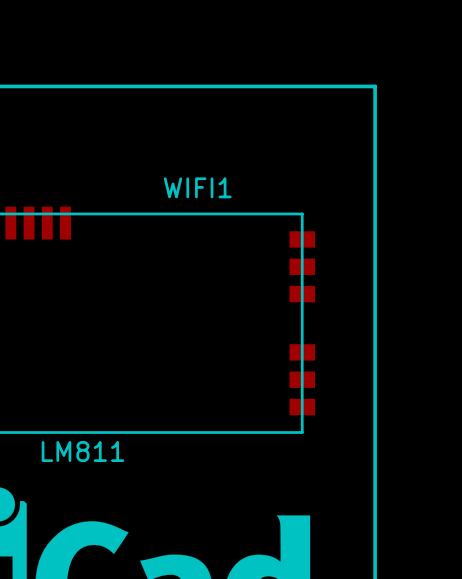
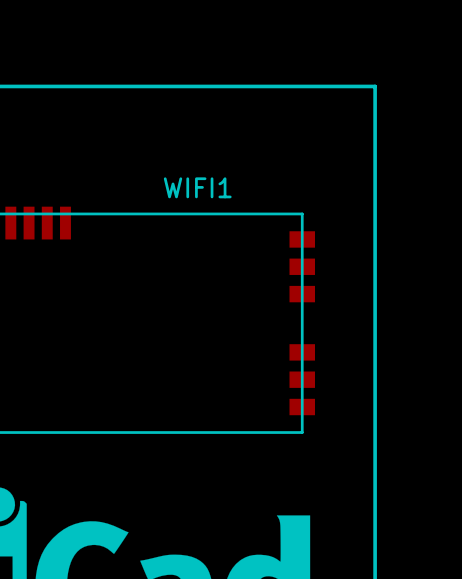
WIFI1 value: LM811 (82, 451) -> none

